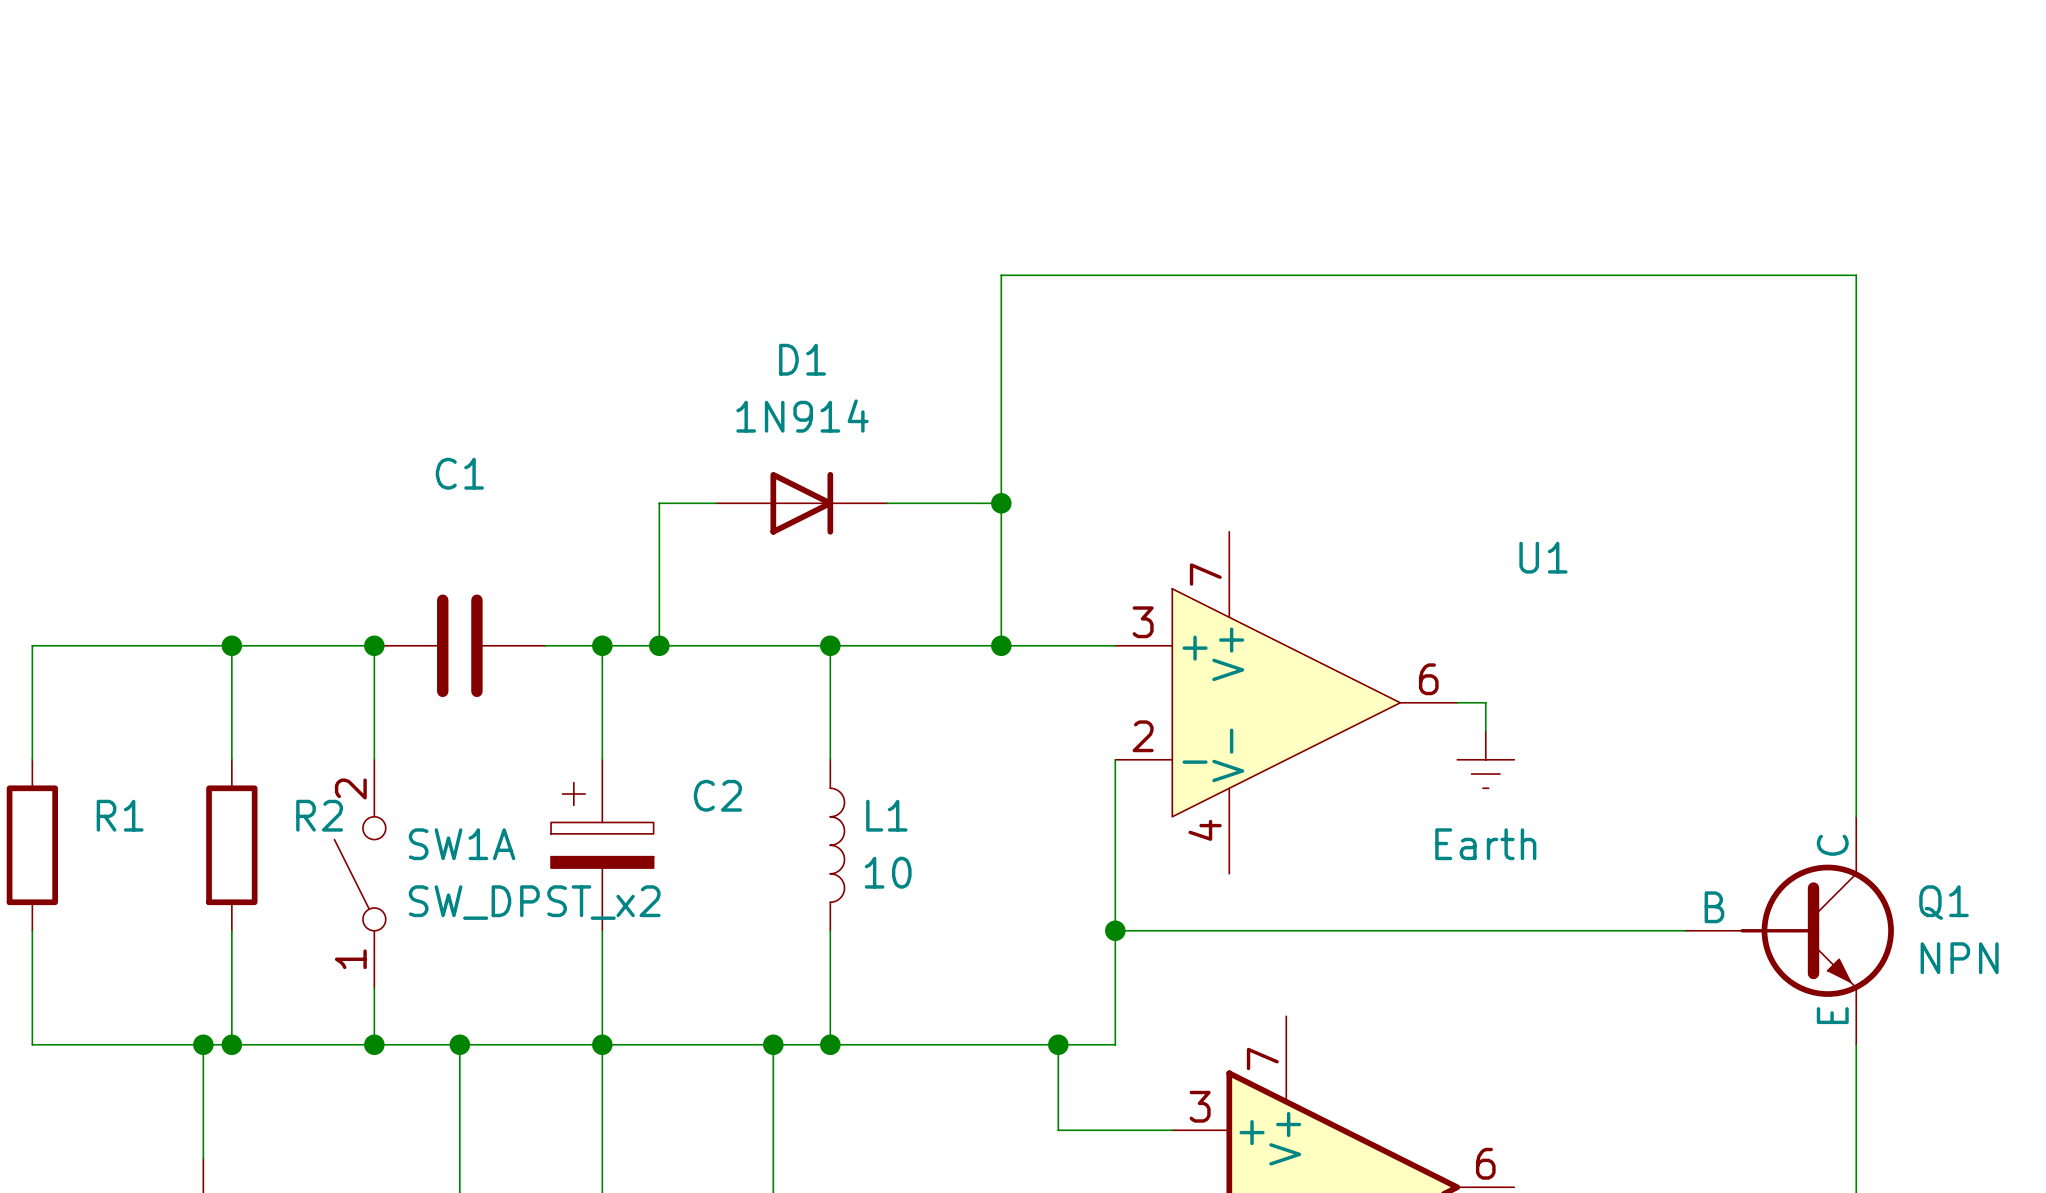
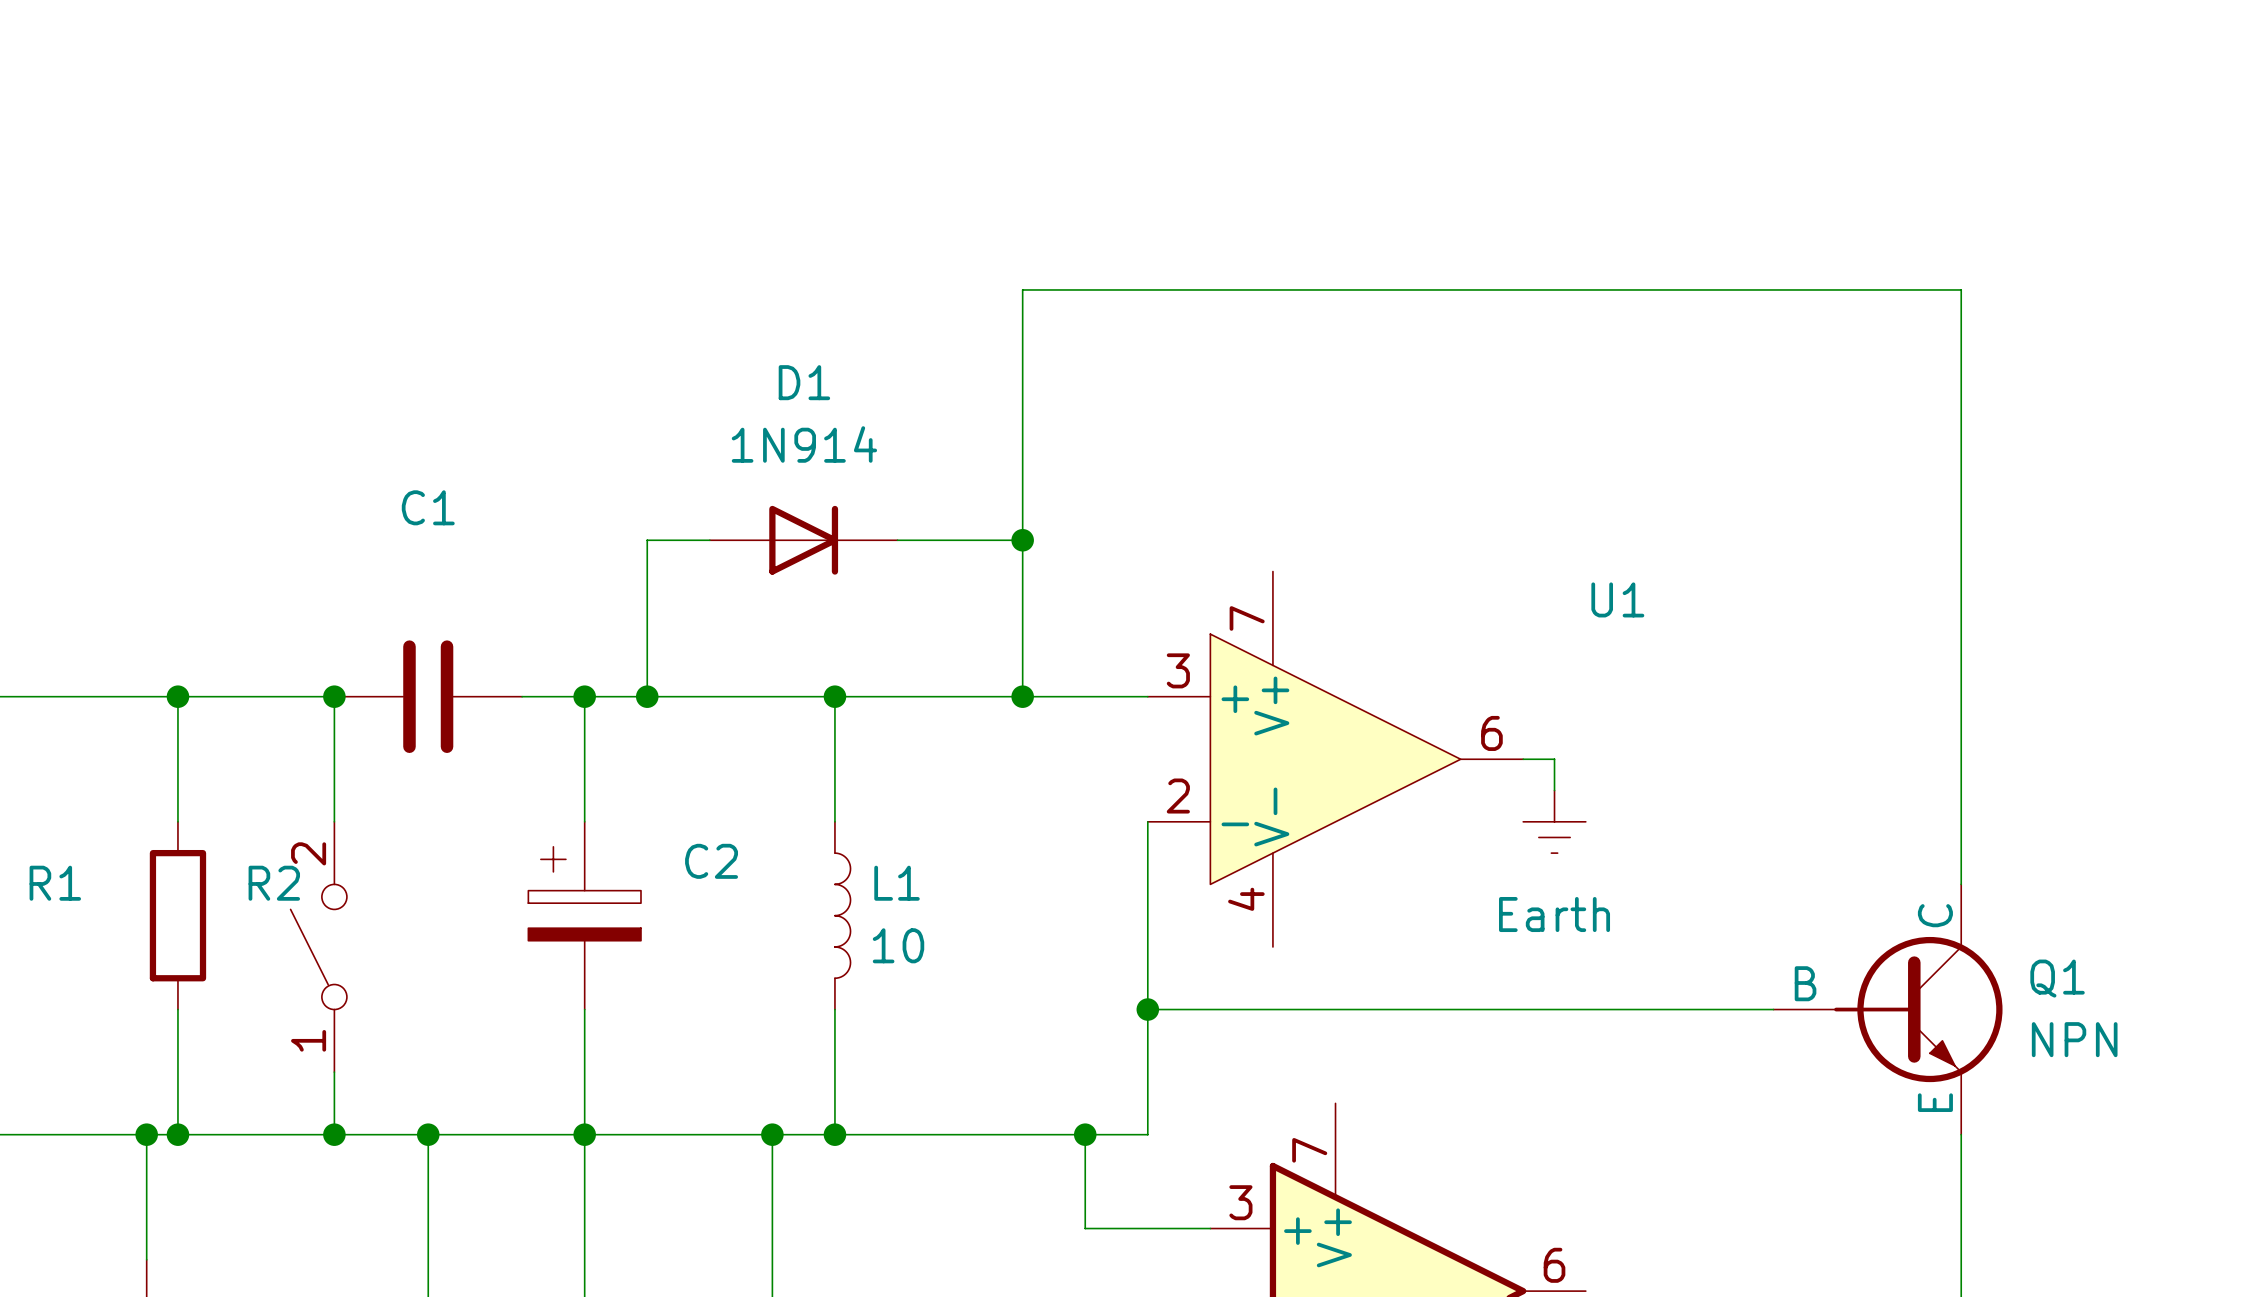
SW1A name: SW1A (462, 844) -> none
SW1A value: SW_DPST_x2 (534, 902) -> none

